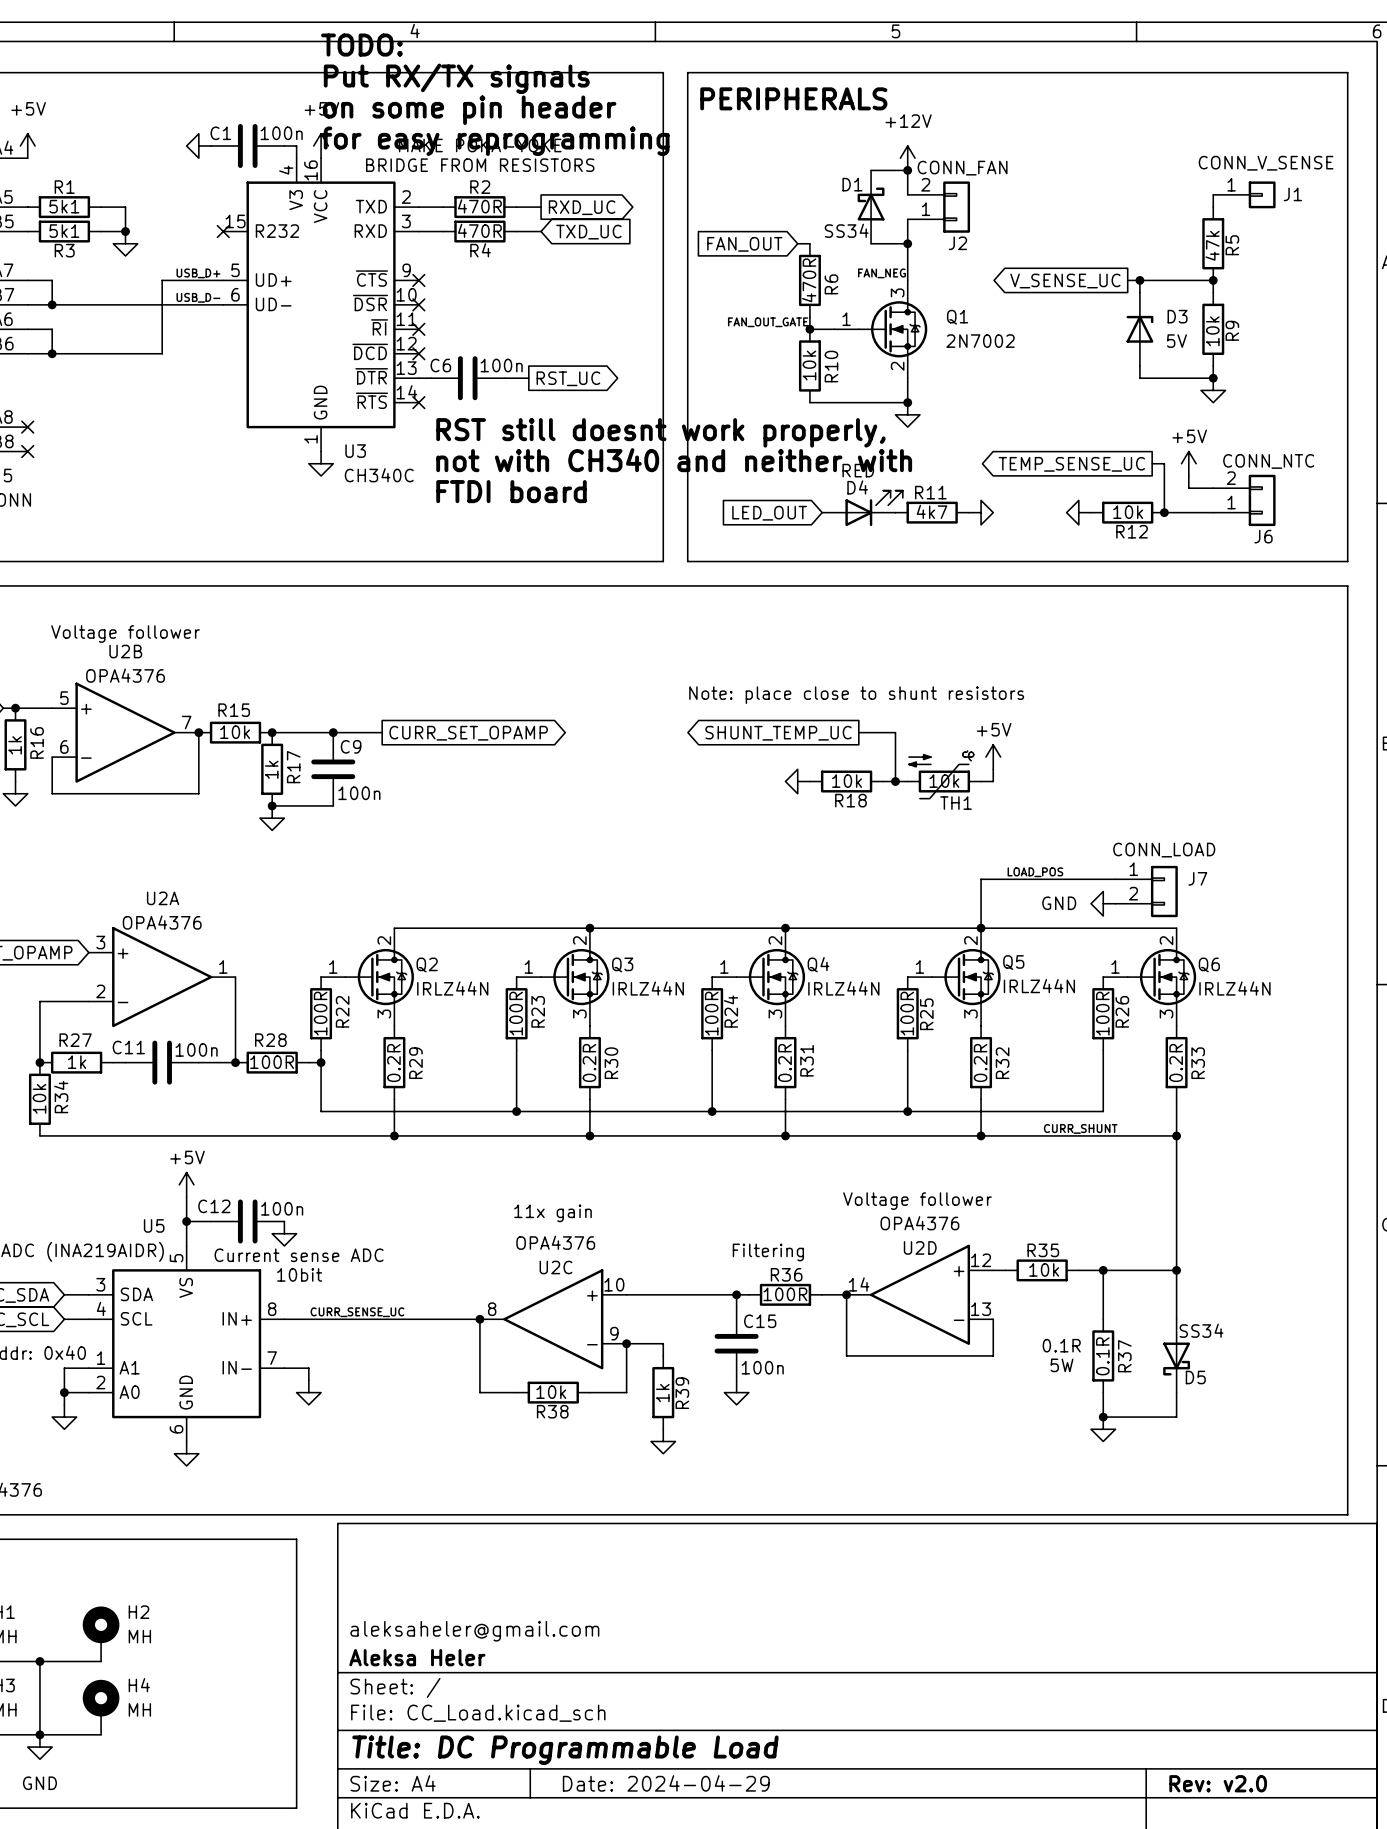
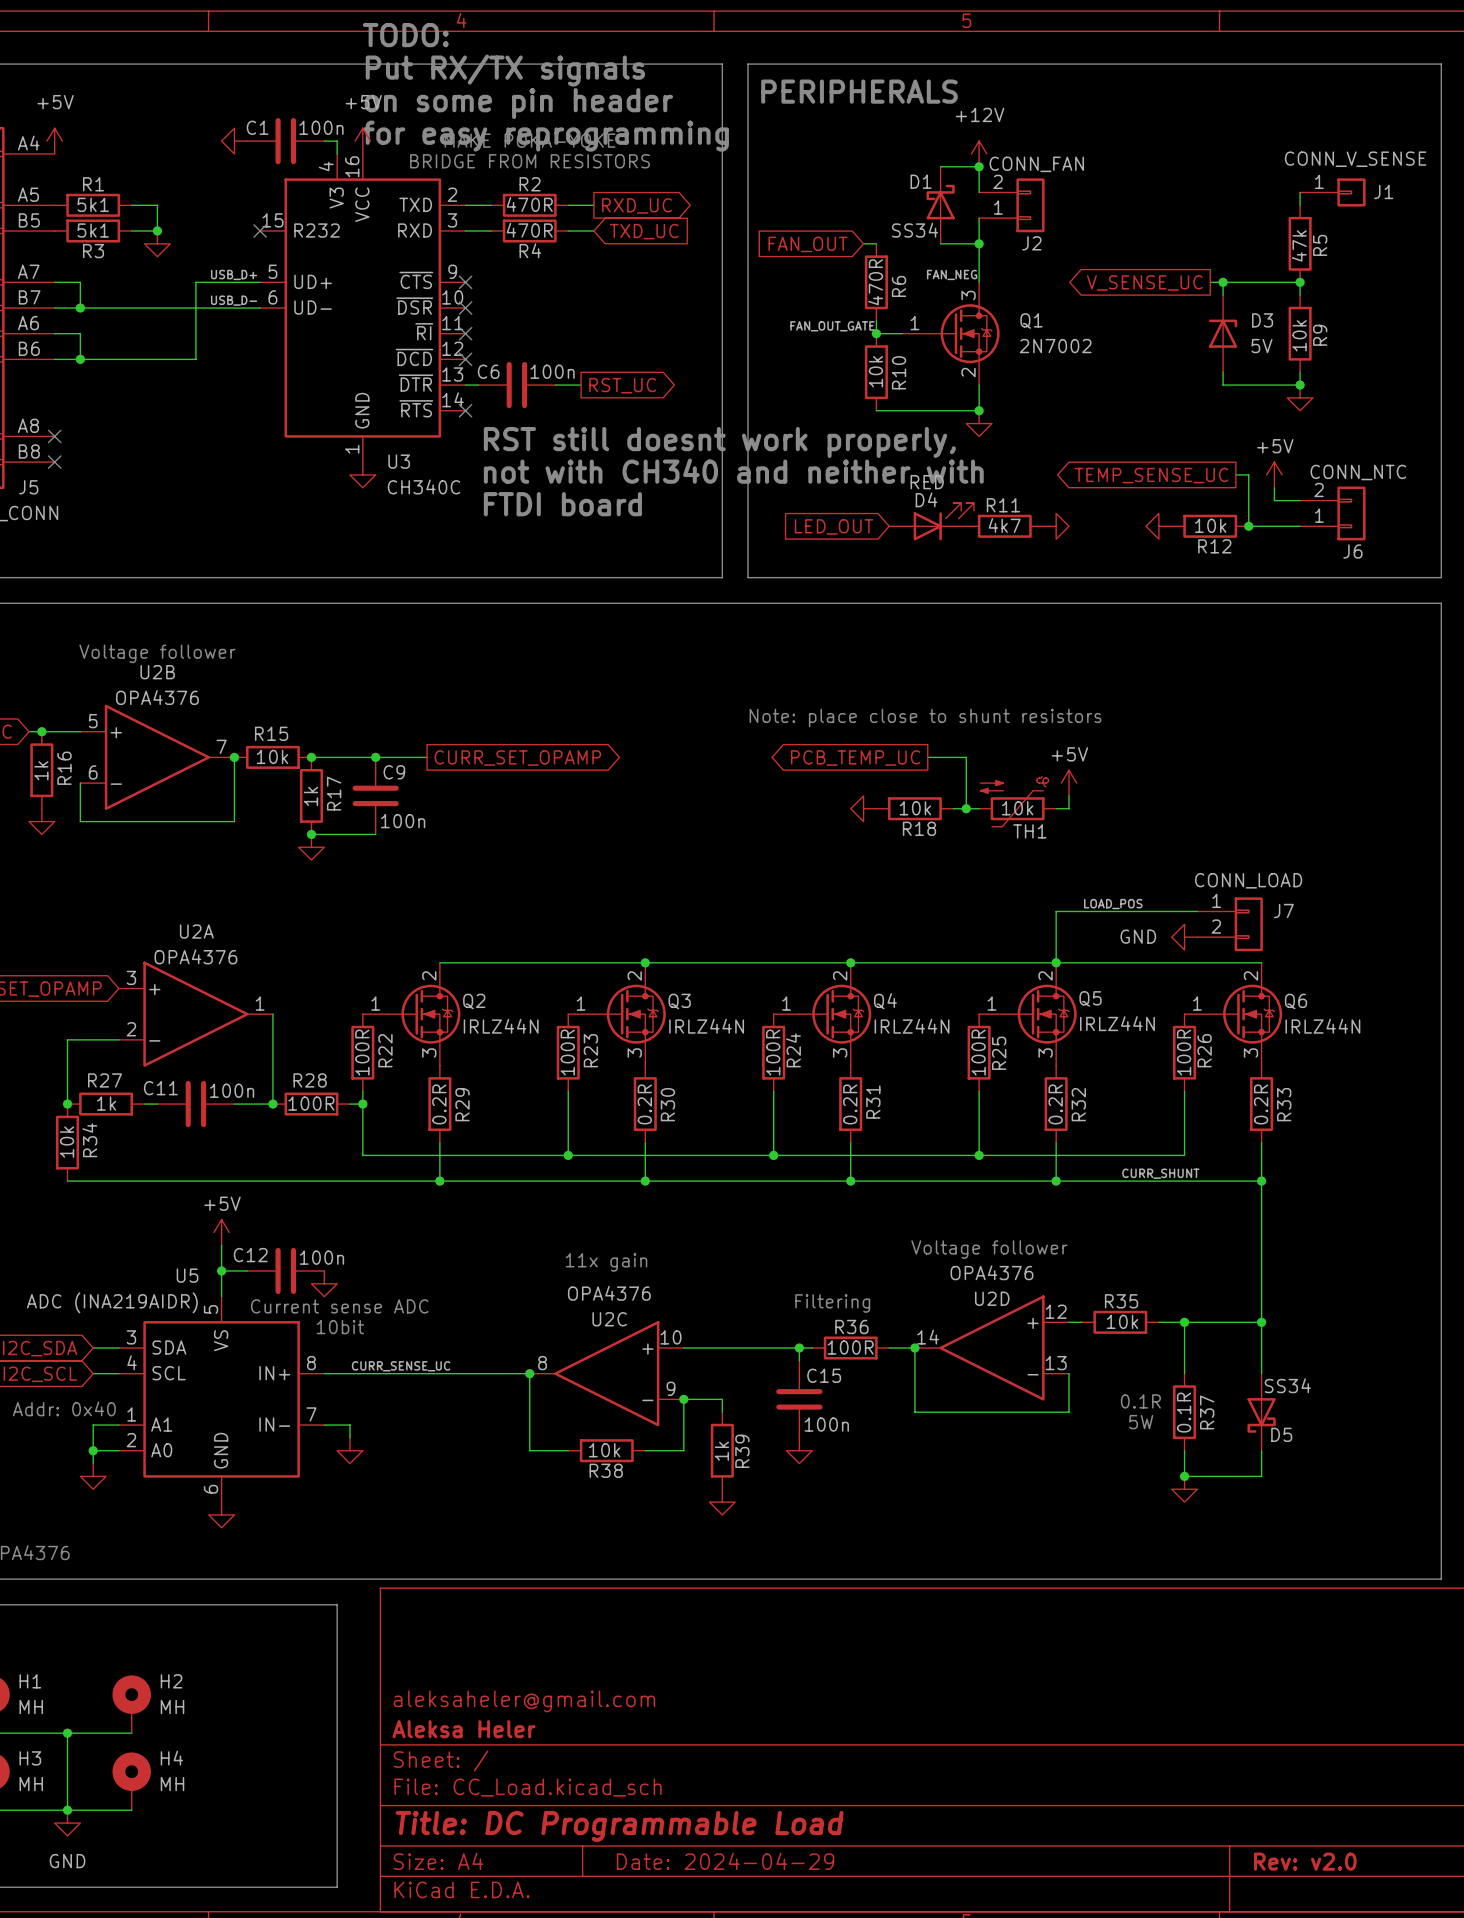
global label: SHUNT_TEMP_UC (778, 733) -> PCB_TEMP_UC (855, 758)

